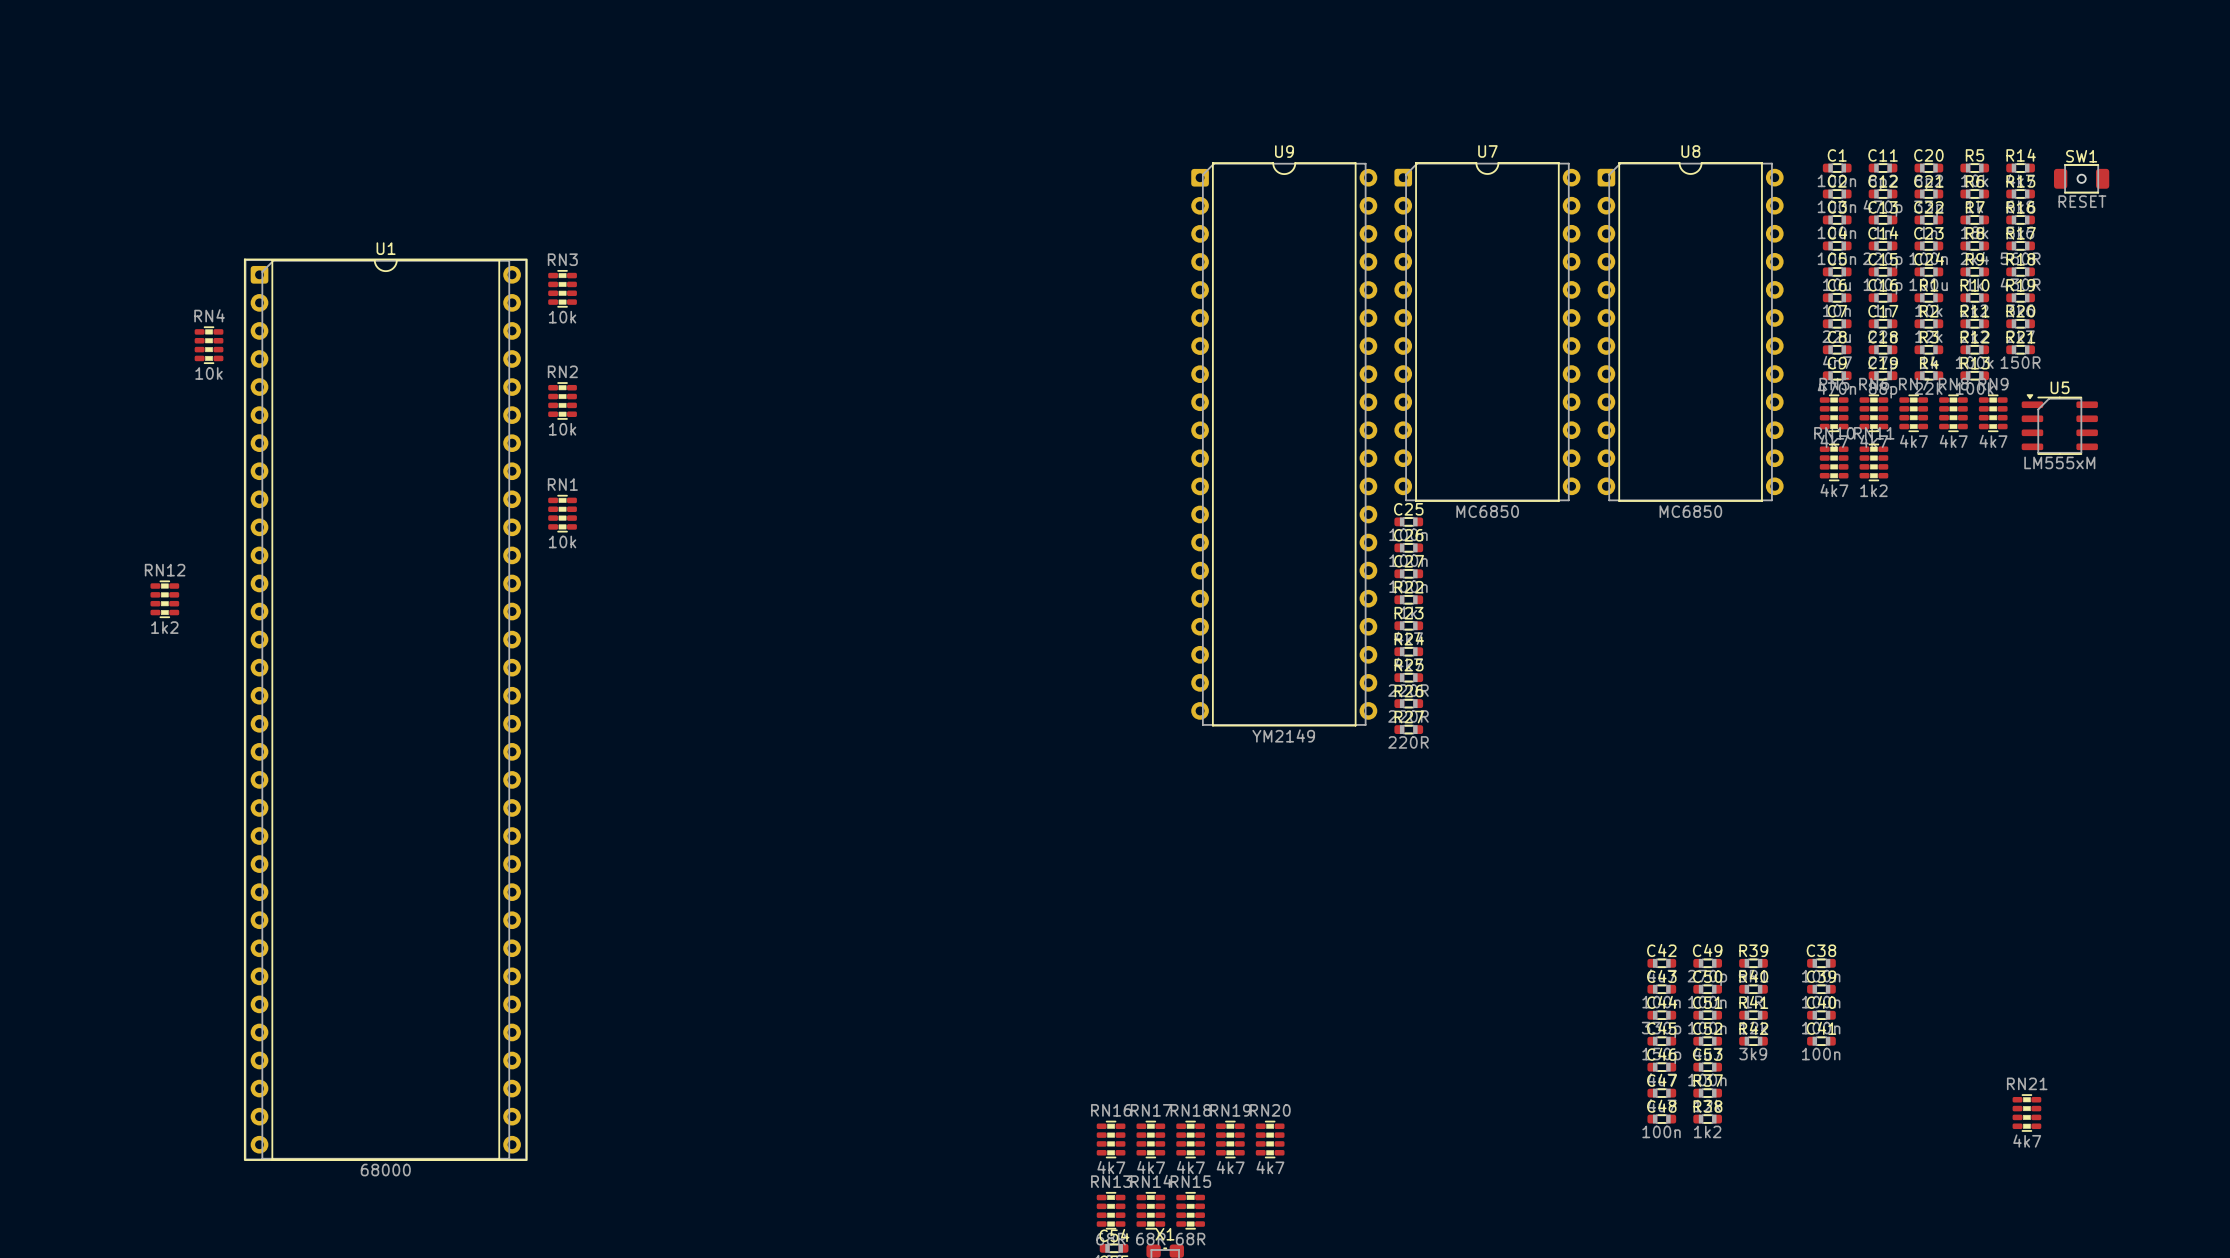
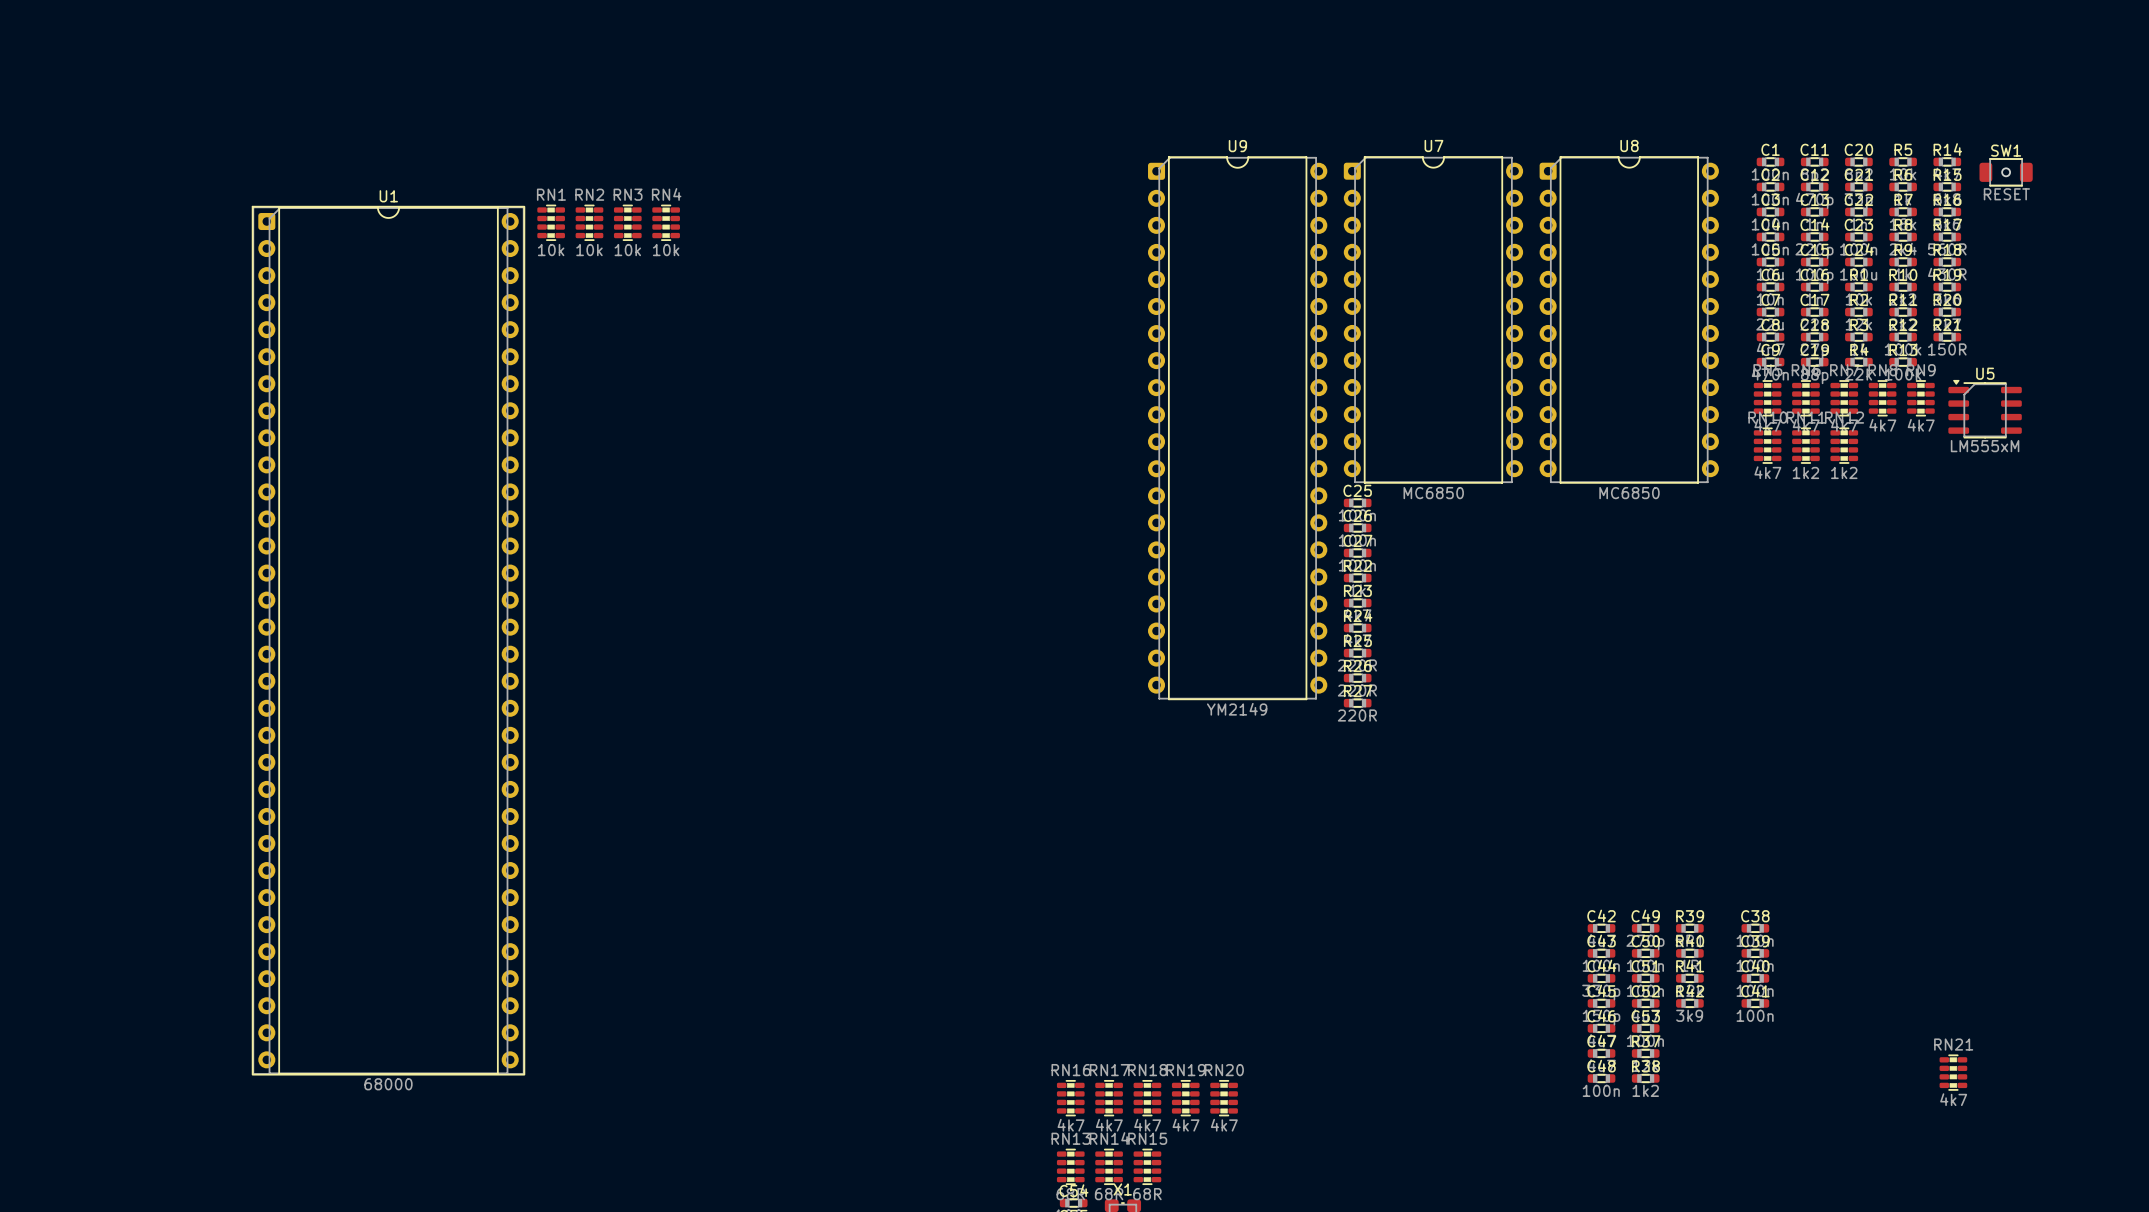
RN3 position: (562, 288) -> (627, 222)
RN4 position: (209, 345) -> (666, 222)
RN2 position: (562, 400) -> (589, 222)
RN1 position: (562, 513) -> (551, 222)
RN12 position: (164, 599) -> (1844, 445)
U1 position: (385, 709) -> (388, 640)

